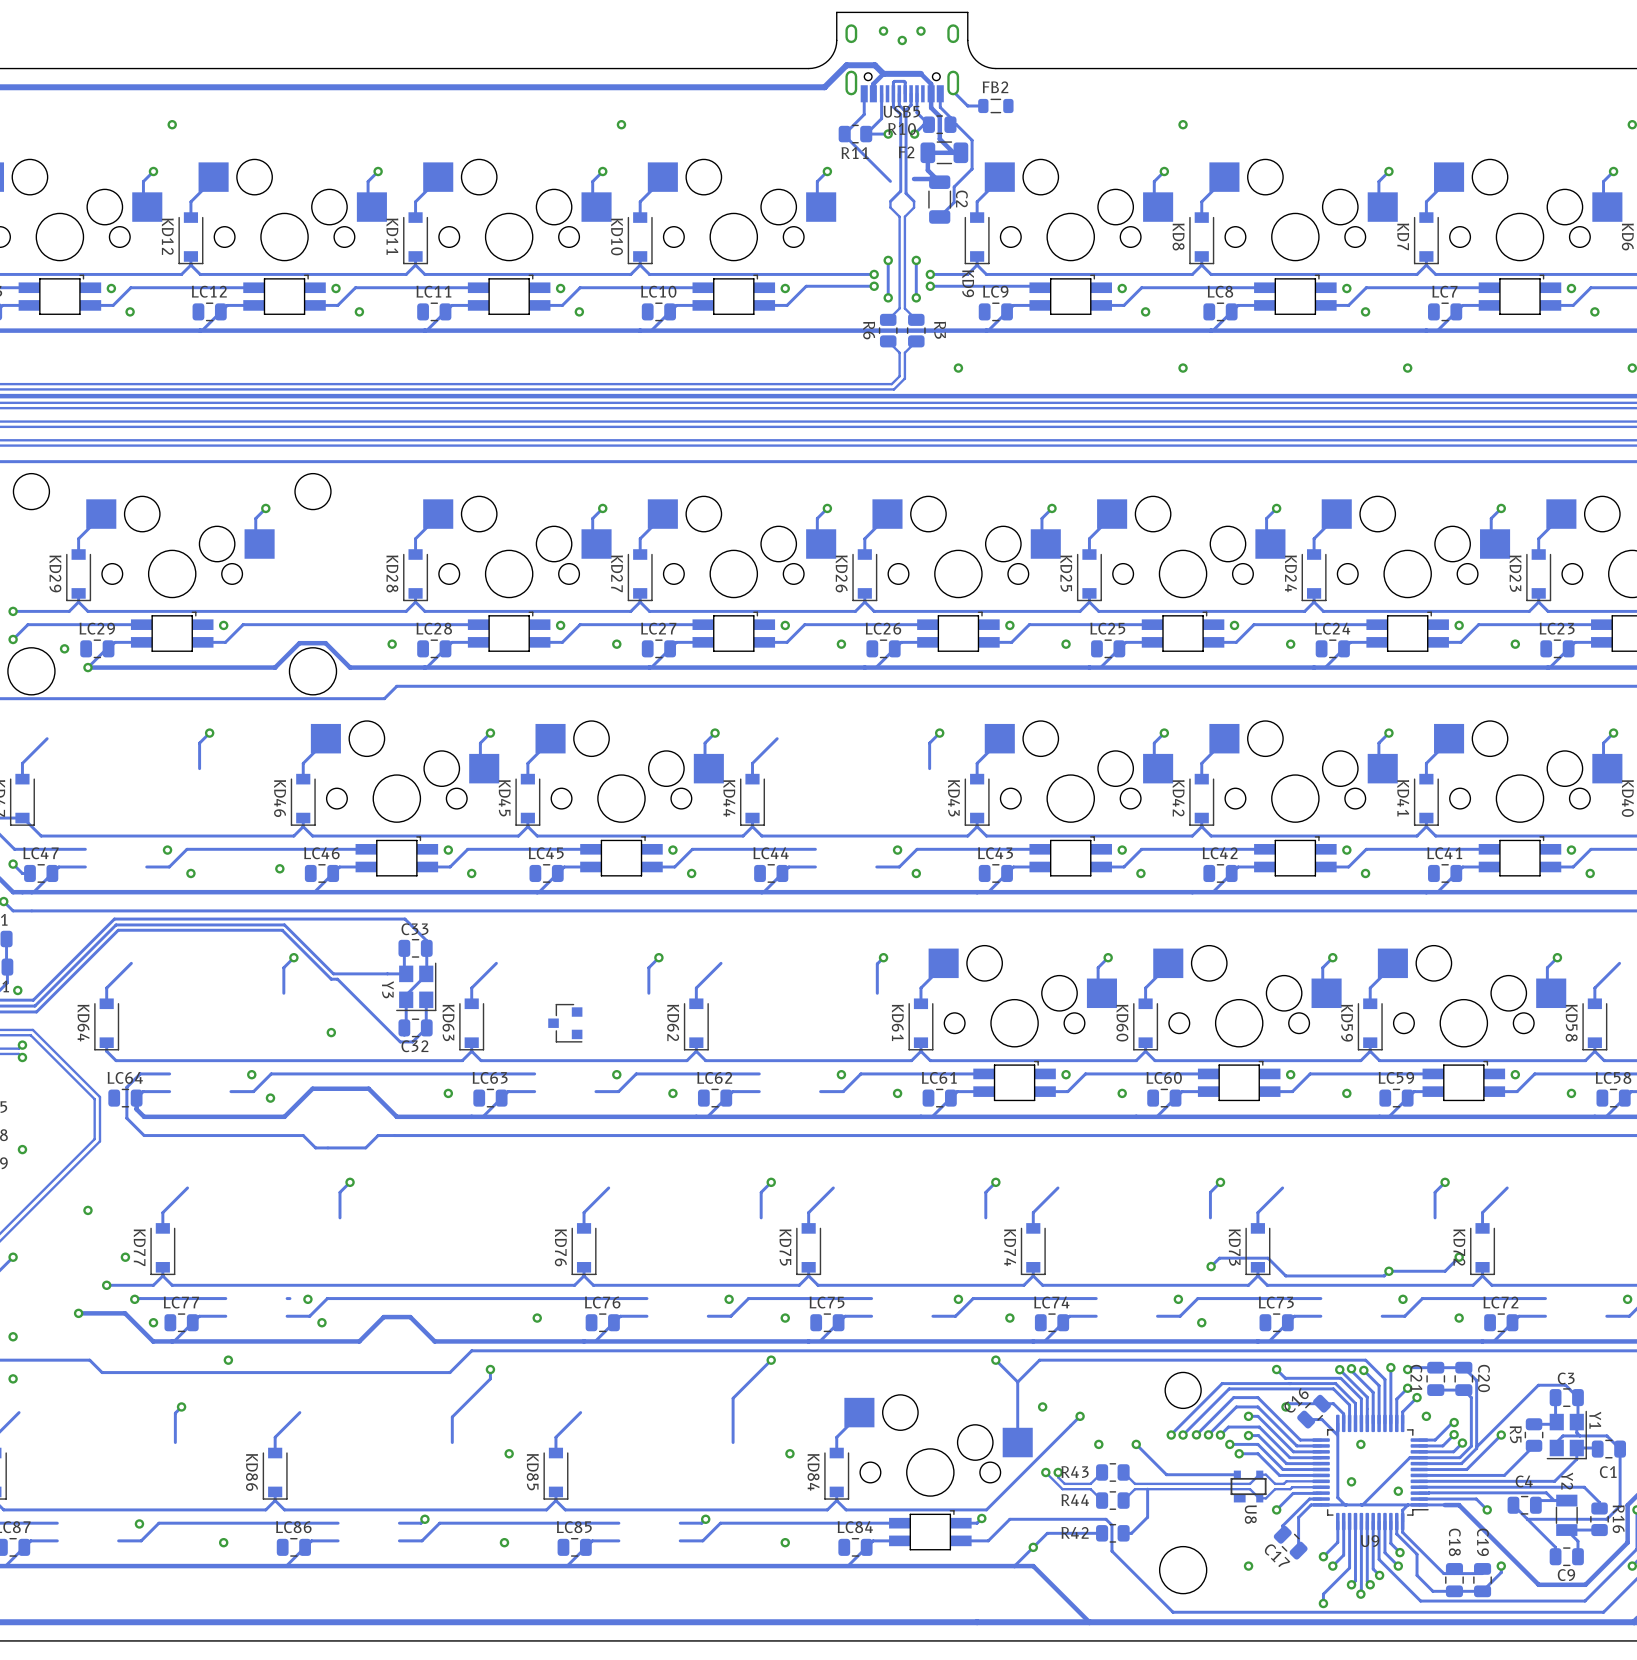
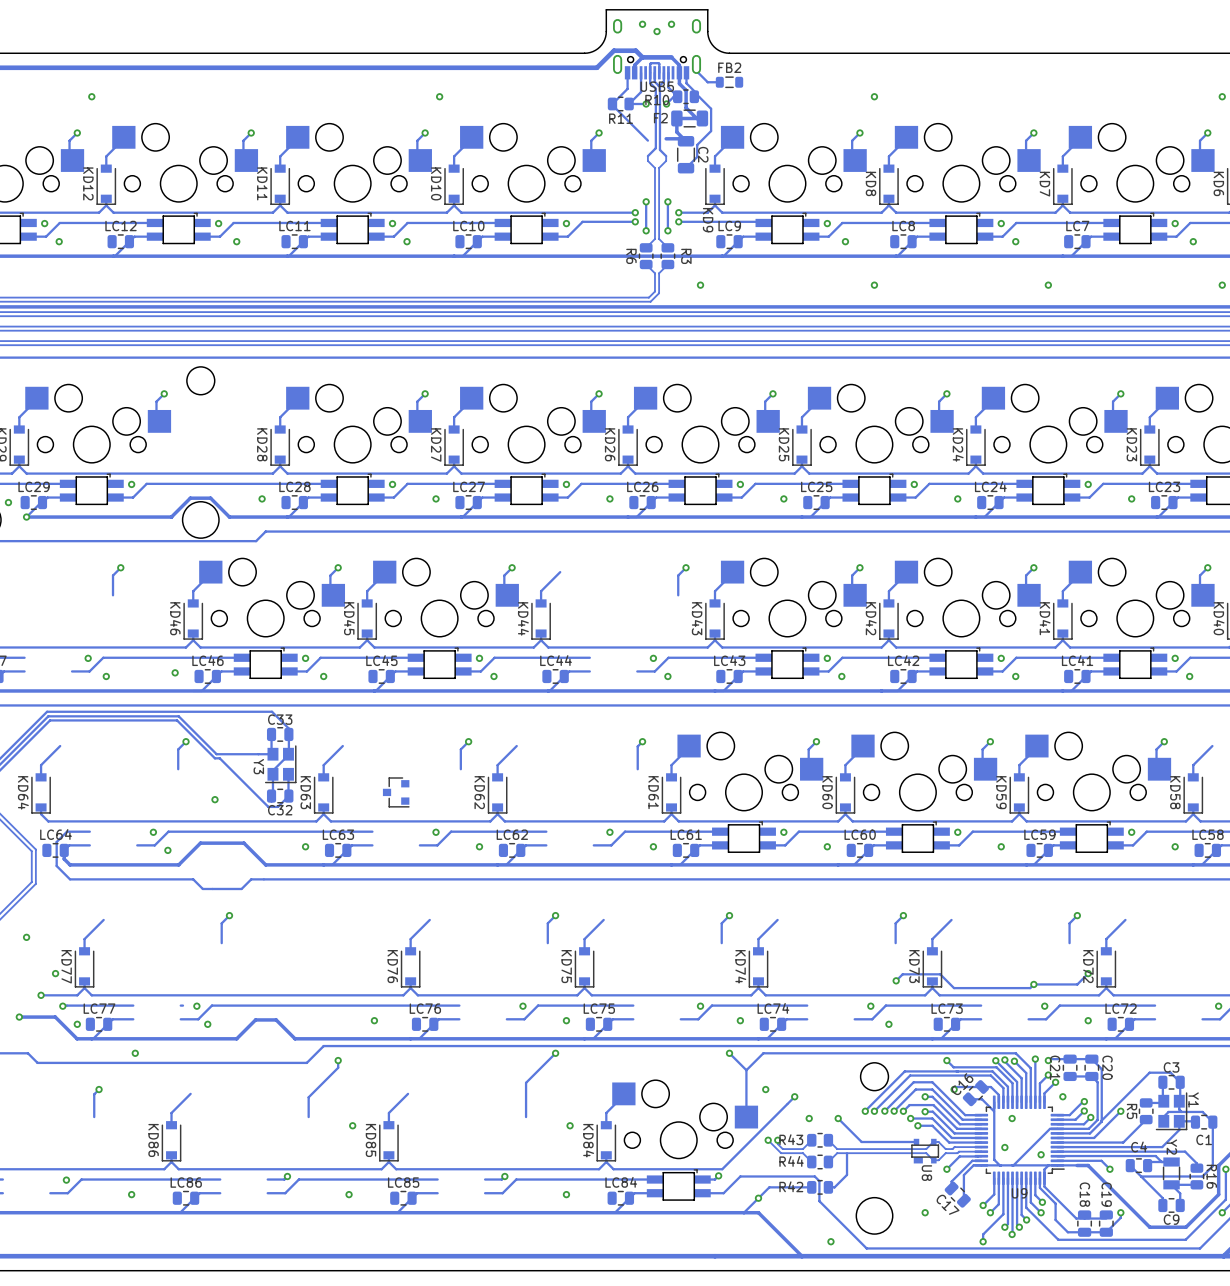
via: none -> (830, 1241)

